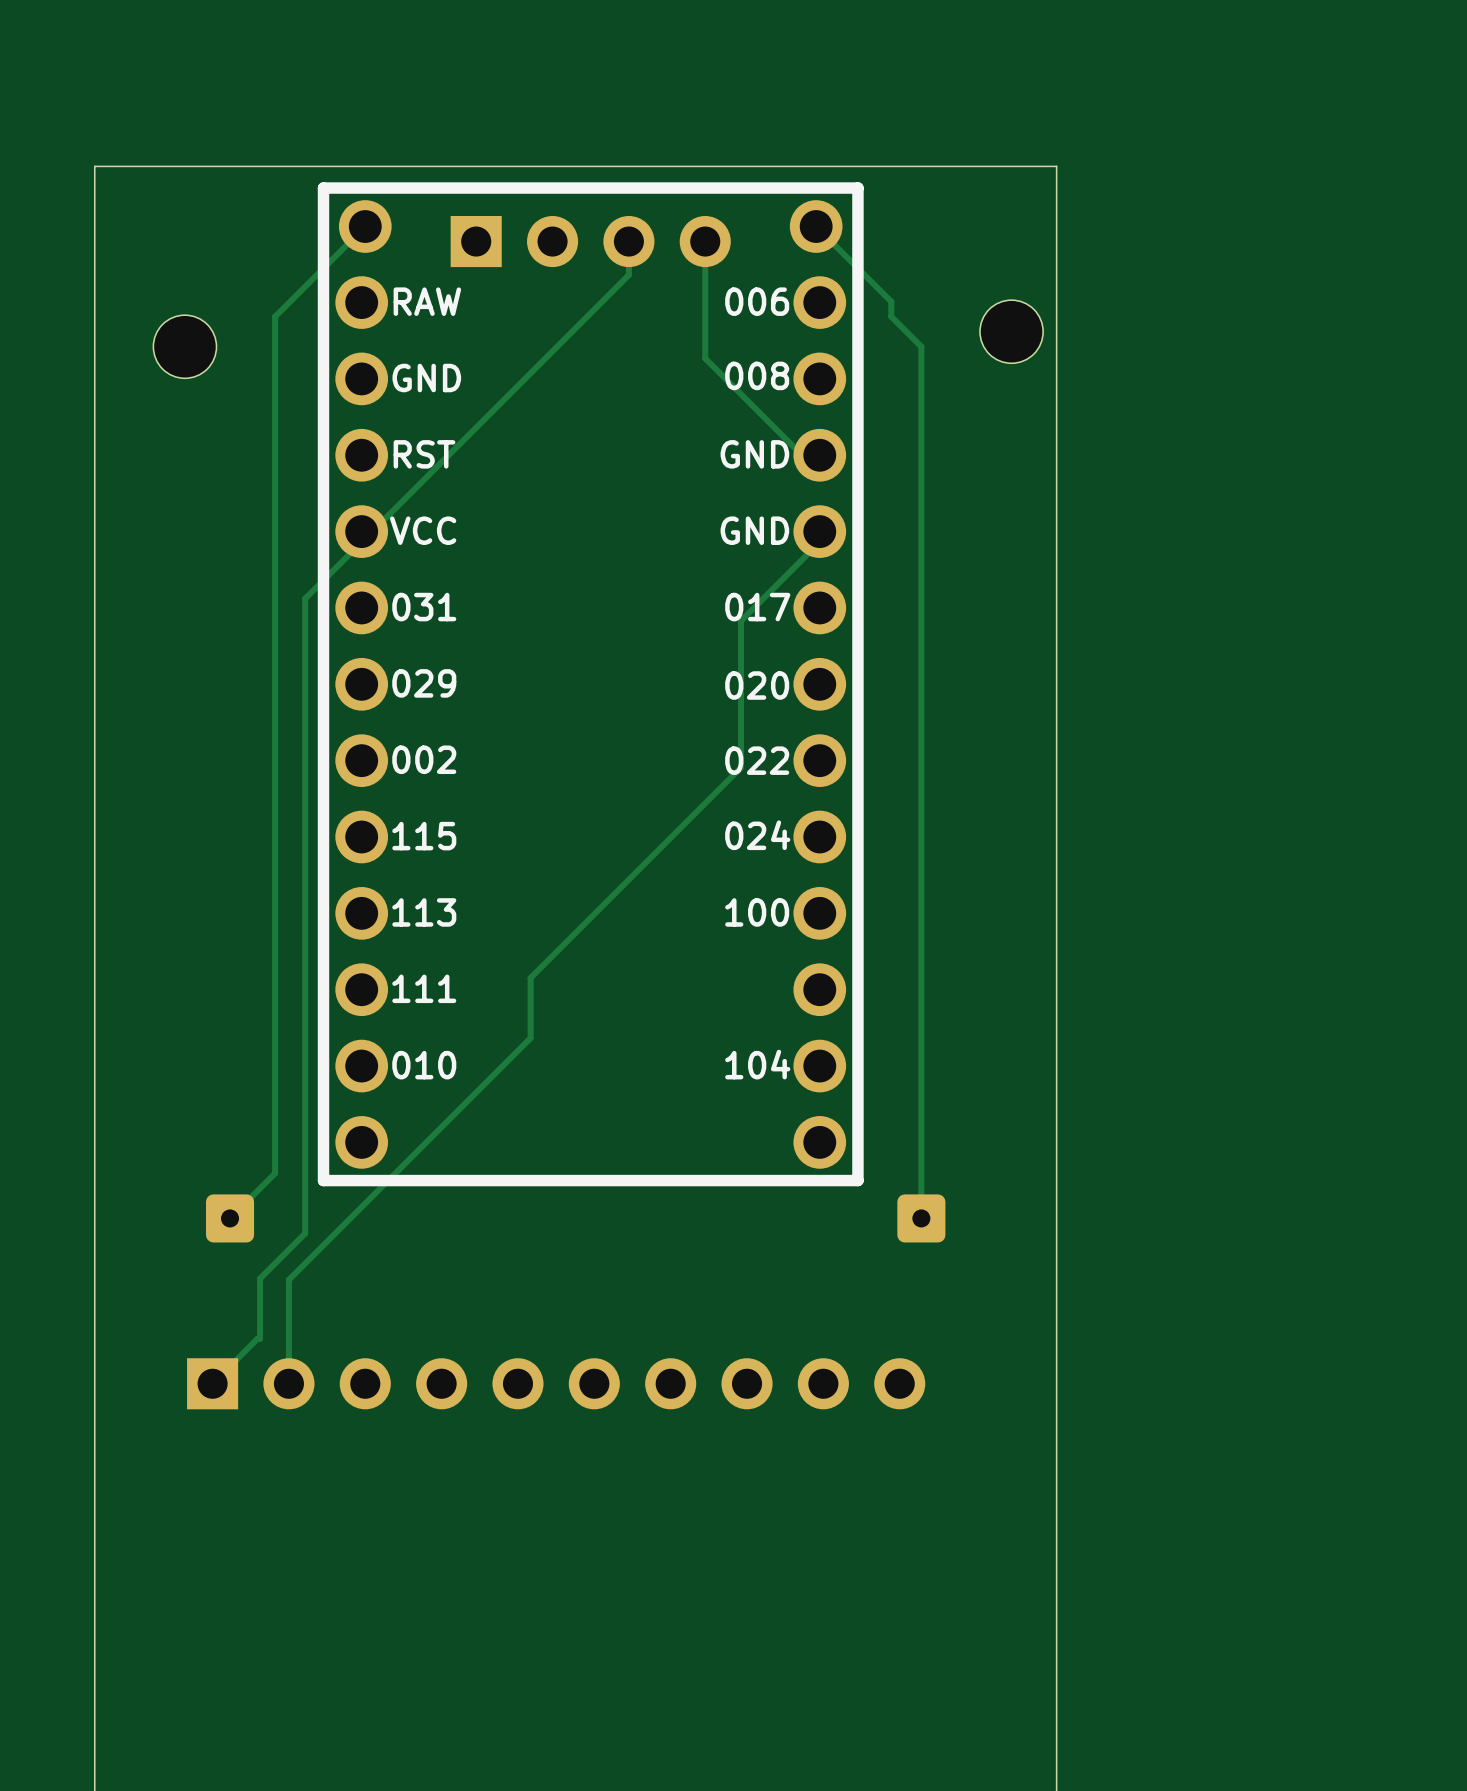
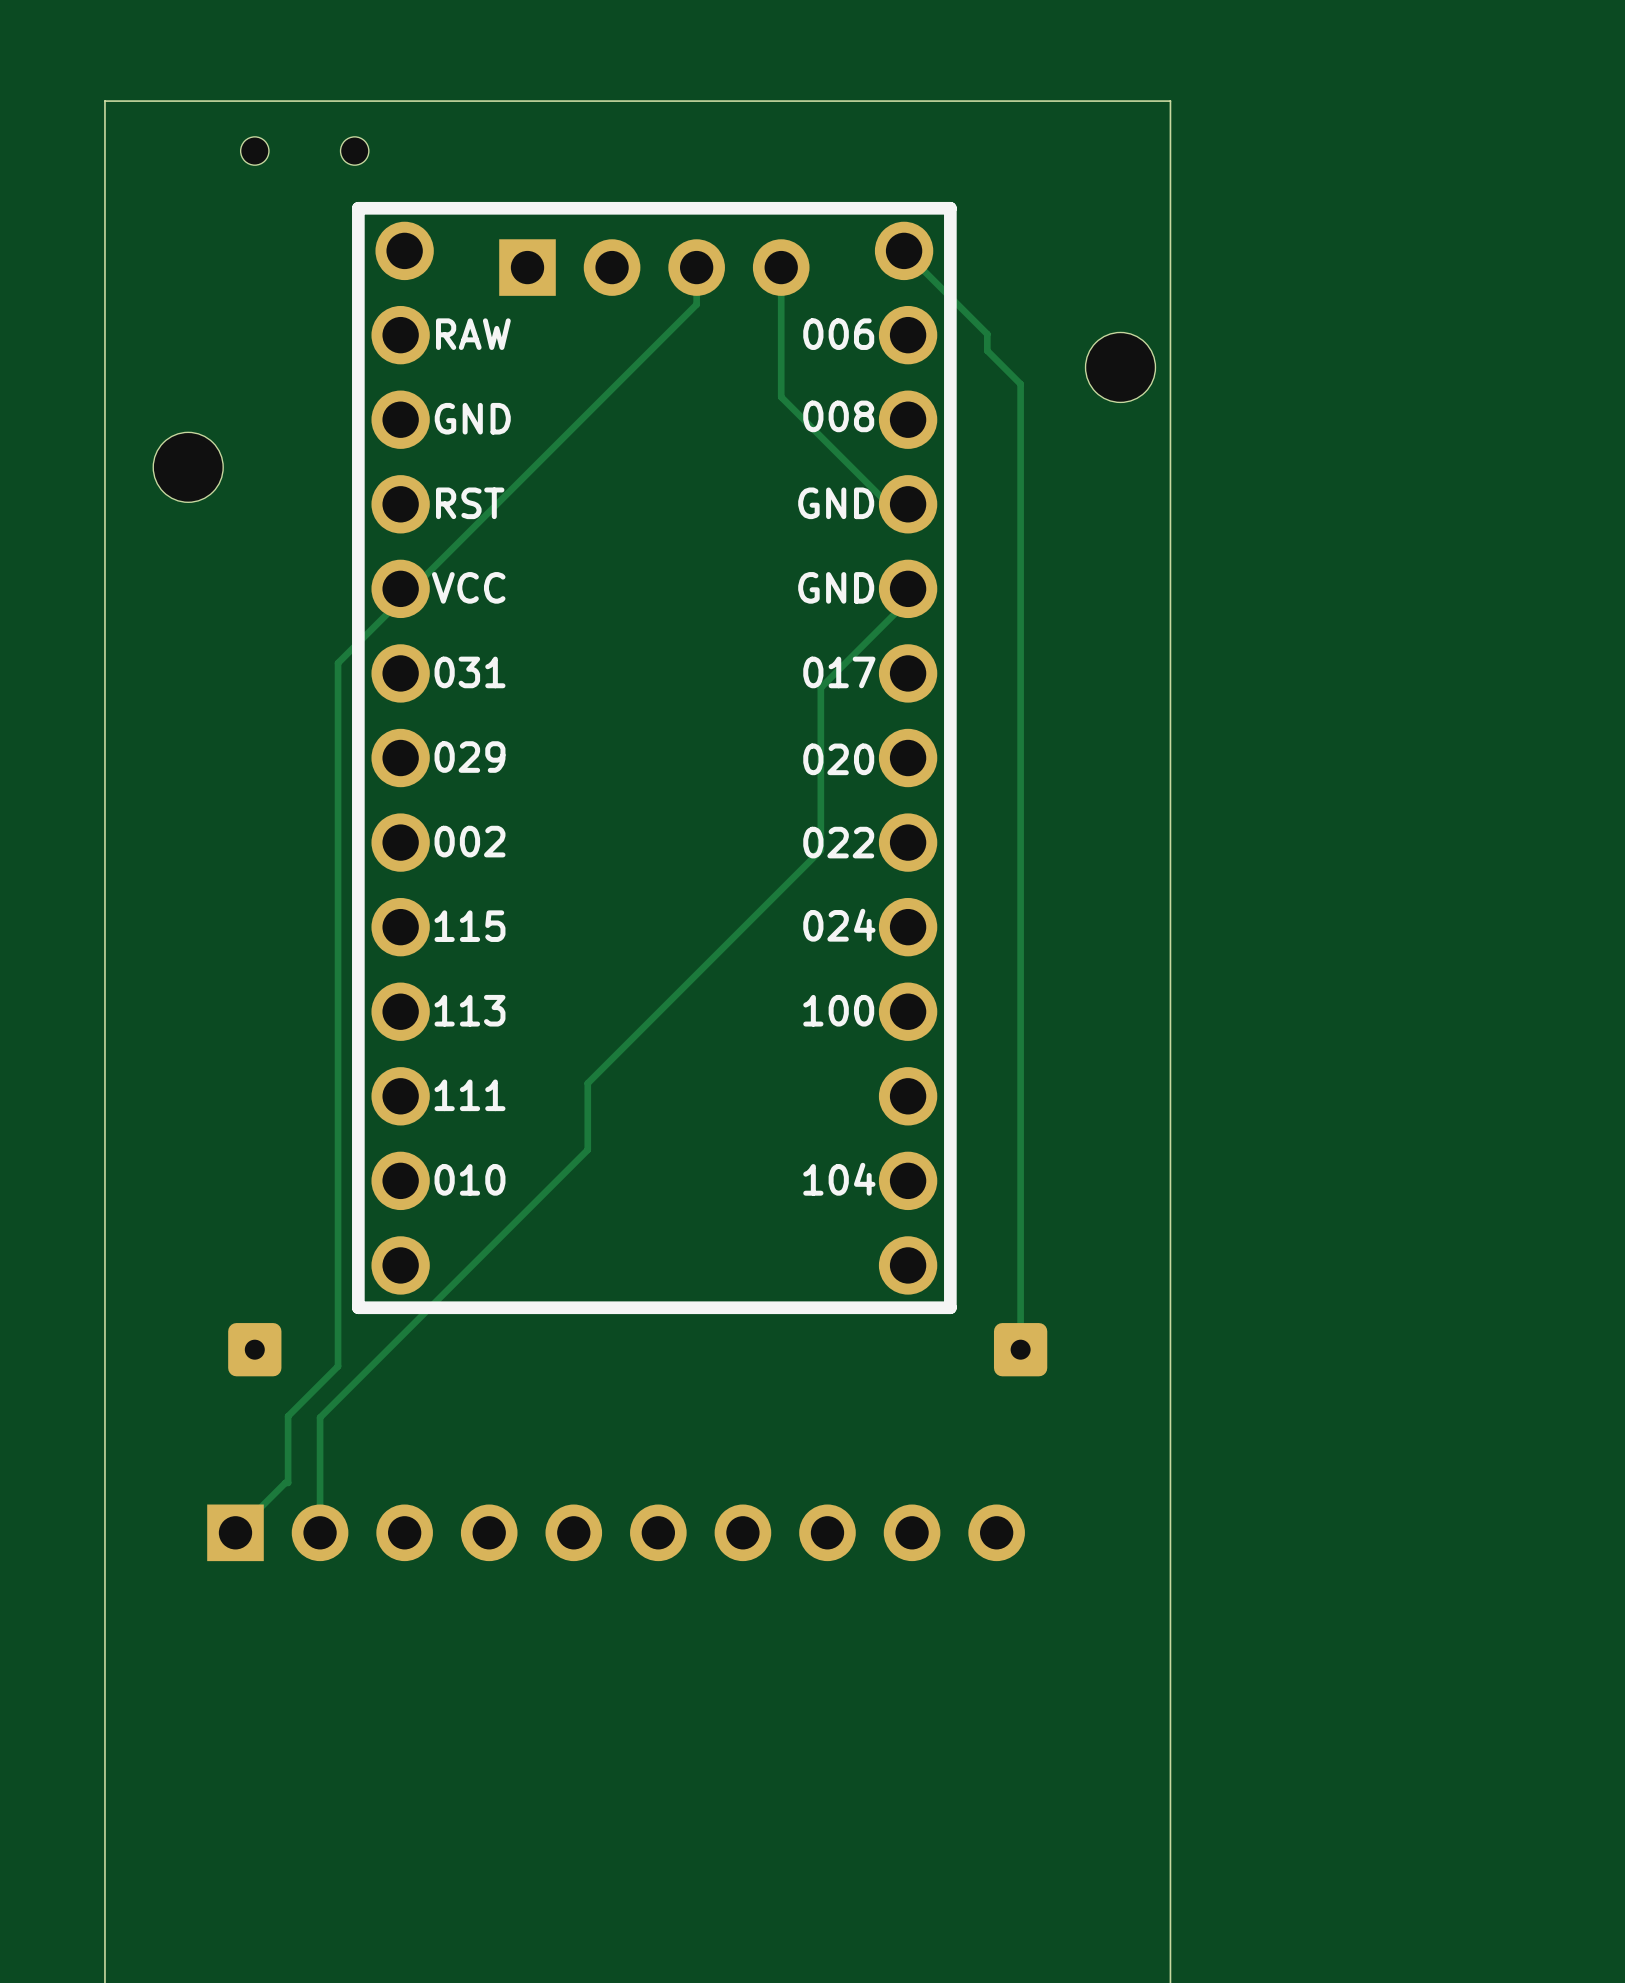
part: none -> (304, 151)
board edge: (1056, 166) (94, 166) -> (1170, 184) (1170, 101) (104, 101) (104, 184)
track: (365, 226) (275, 316) (275, 1173) (230, 1218) -> none
part position: (184, 346) -> (188, 467)

